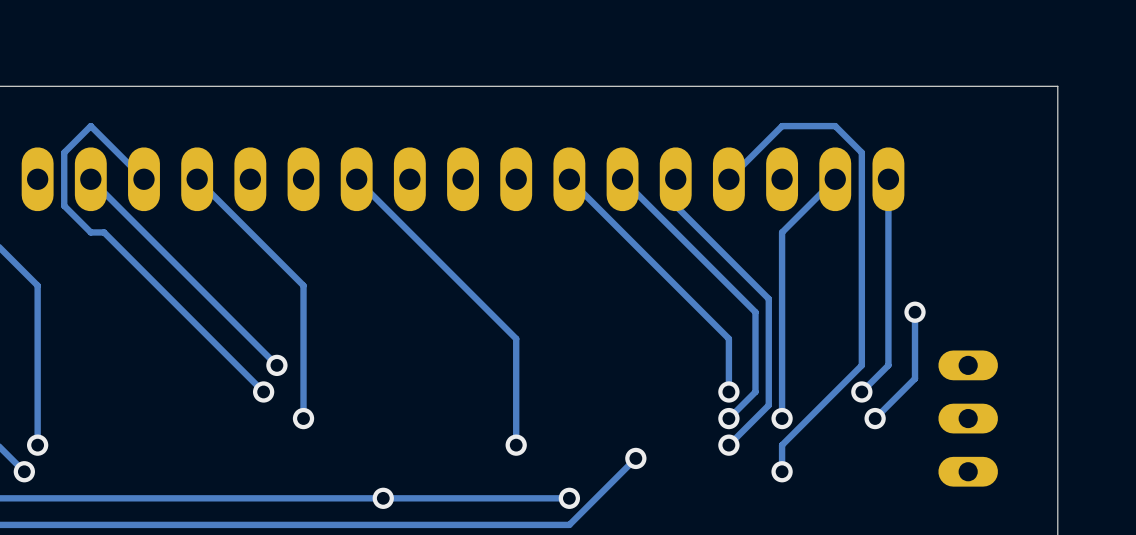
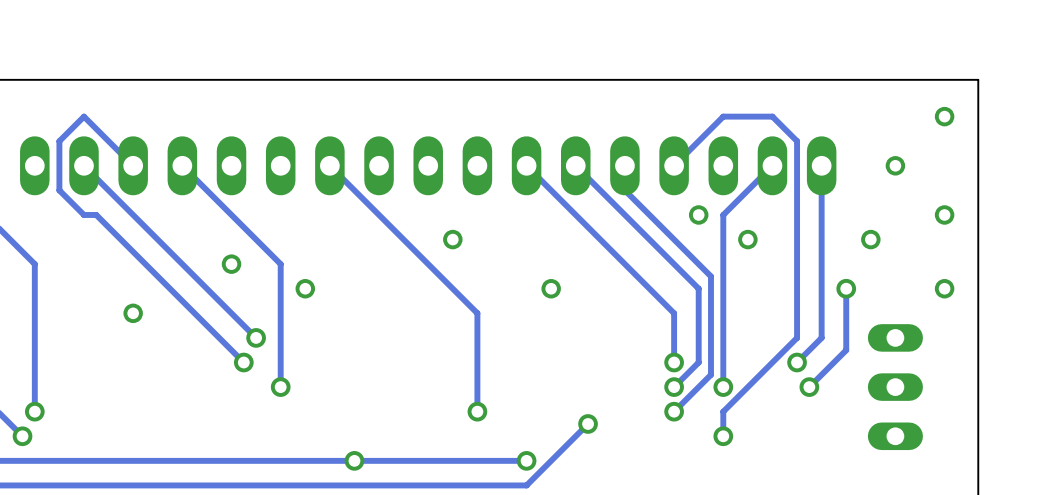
via: none -> (944, 116)
via: none -> (895, 165)
via: none -> (698, 214)
via: none -> (944, 214)
via: none -> (452, 239)
via: none -> (747, 239)
via: none -> (870, 239)
via: none -> (231, 264)
via: none -> (305, 288)
via: none -> (551, 288)
via: none -> (944, 288)
via: none -> (133, 313)

